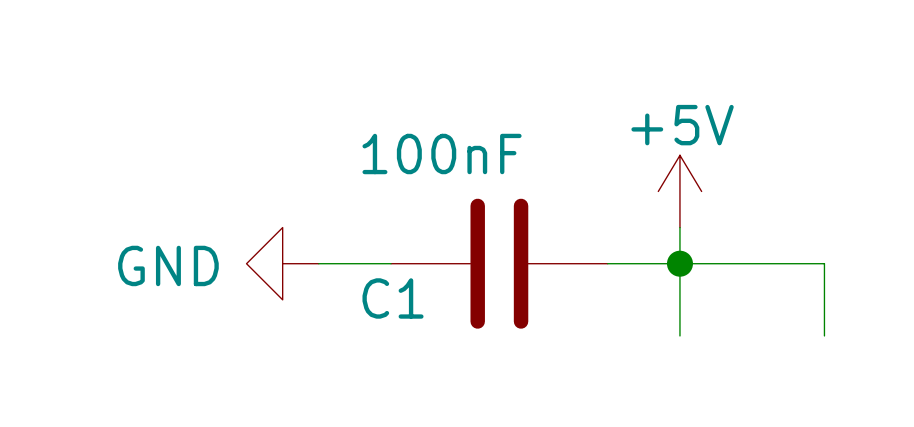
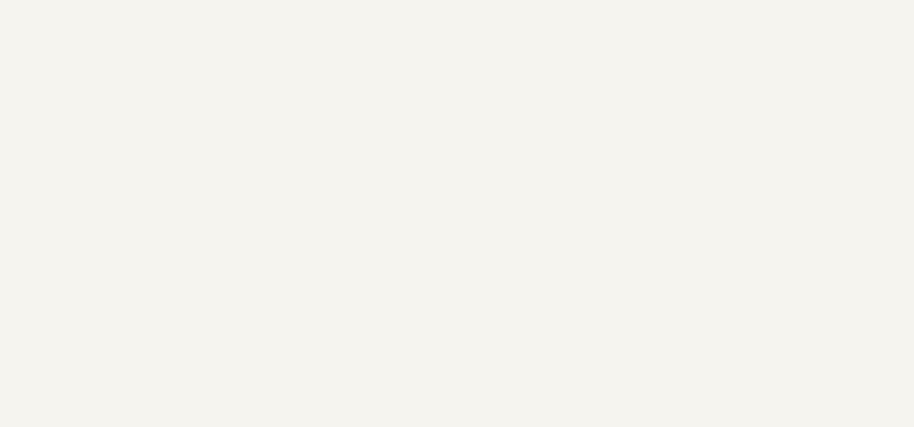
power symbol: +5V (679, 191) -> none
wire: (679, 227) (679, 335) -> none
power symbol: GND (282, 263) -> none
wire: (318, 263) (391, 263) -> none
C1: 100nF (499, 263) -> none
wire: (607, 263) (824, 263) (824, 335) -> none
junction: (679, 263) -> none

